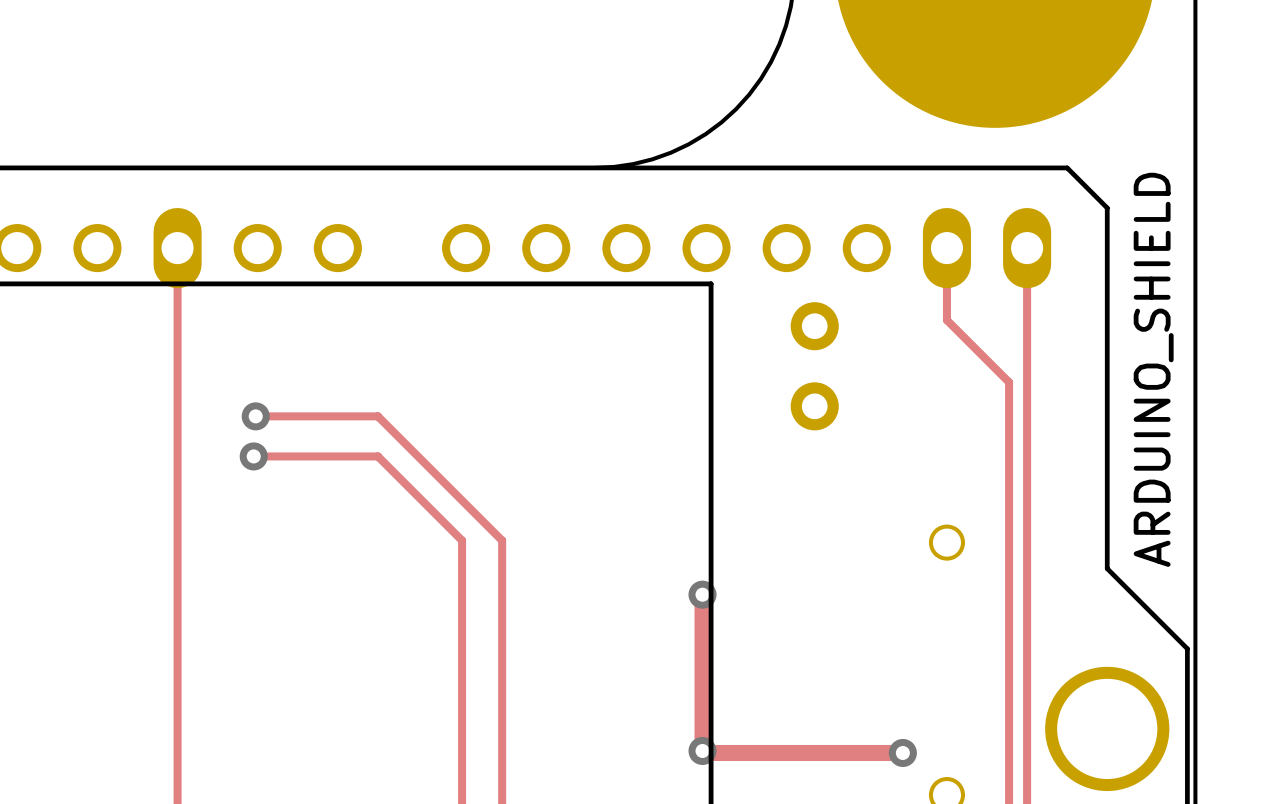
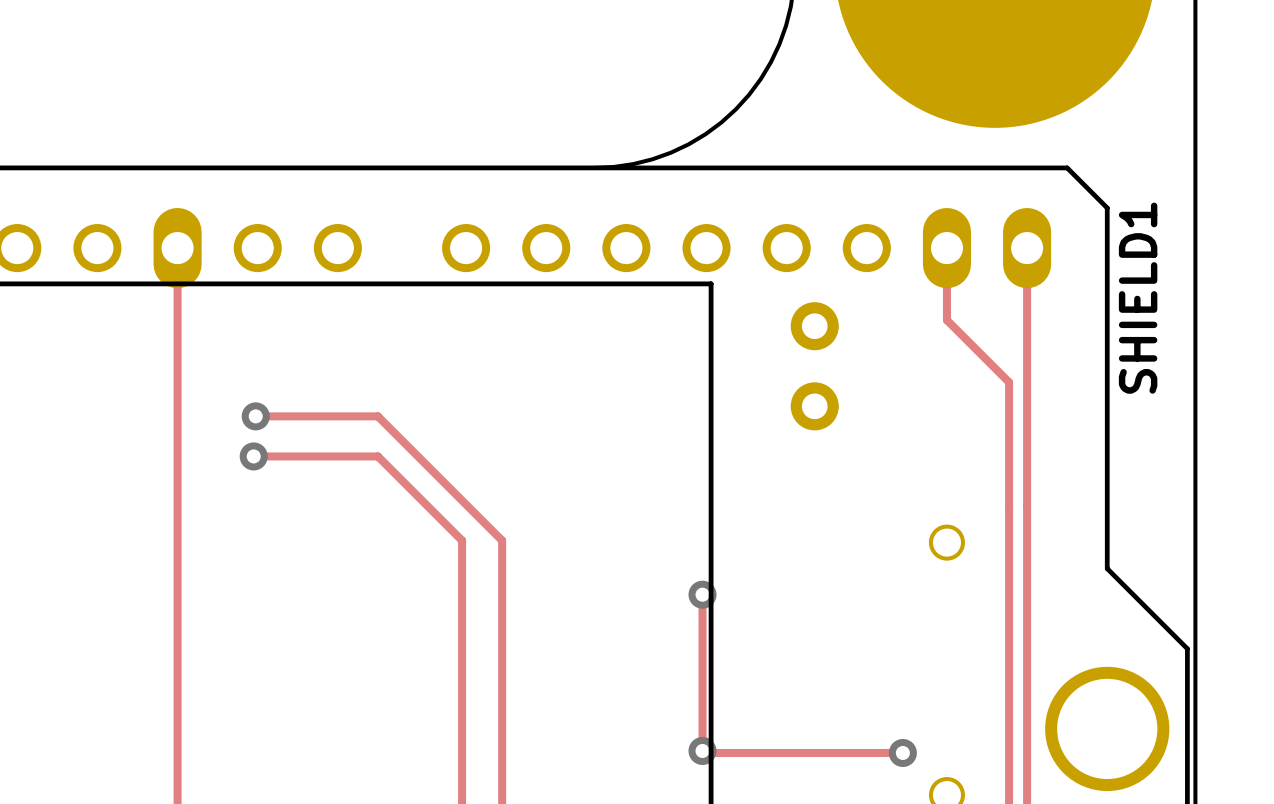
SHIELD1 name: none -> SHIELD1 (1138, 298)
SHIELD1 value: ARDUINO_SHIELD (1153, 369) -> none
track width: thick (702, 594) (702, 750) (704, 752) (902, 752) -> thin (702, 594) (702, 750) (704, 752) (902, 752)

